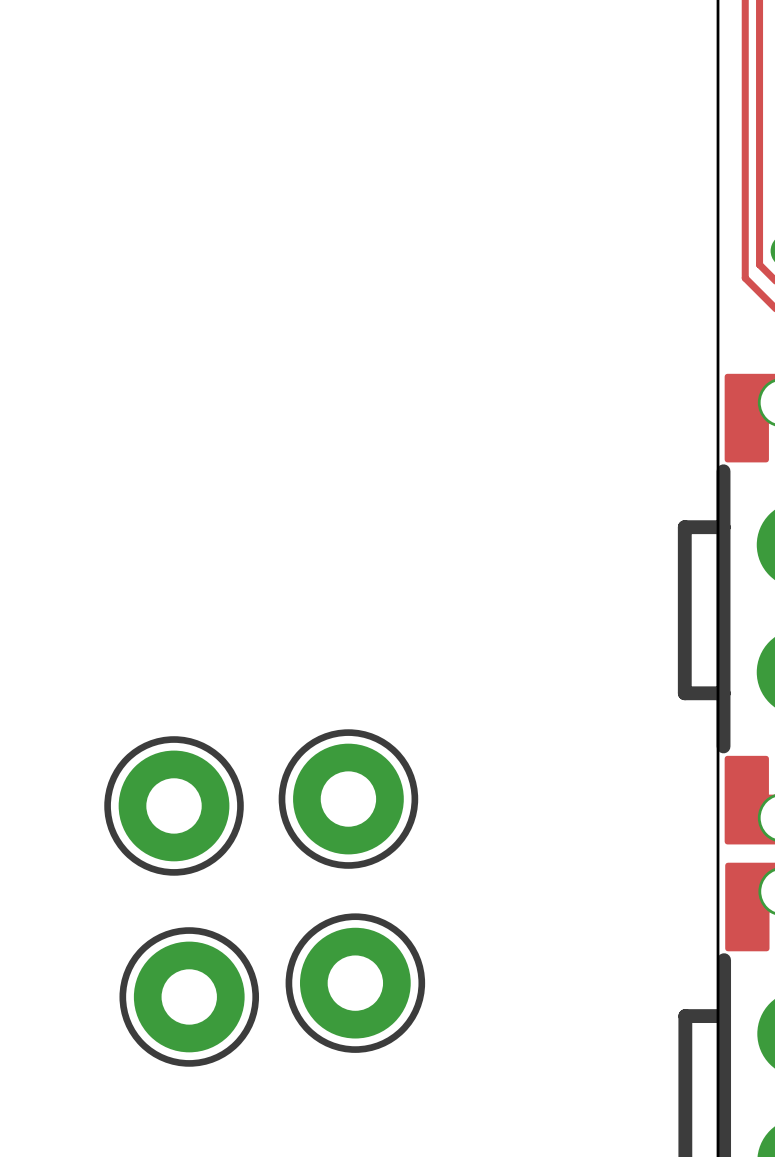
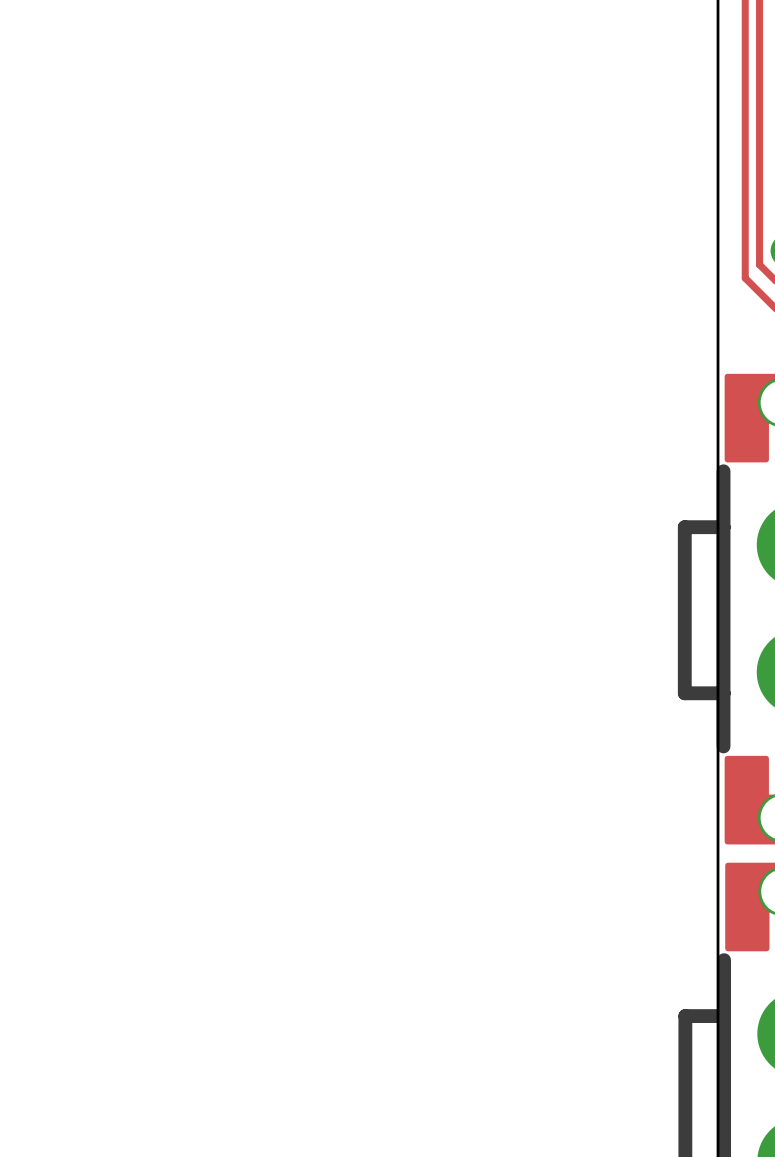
part: (348, 799) -> none
part: (174, 805) -> none
part: (355, 983) -> none
part: (189, 996) -> none

